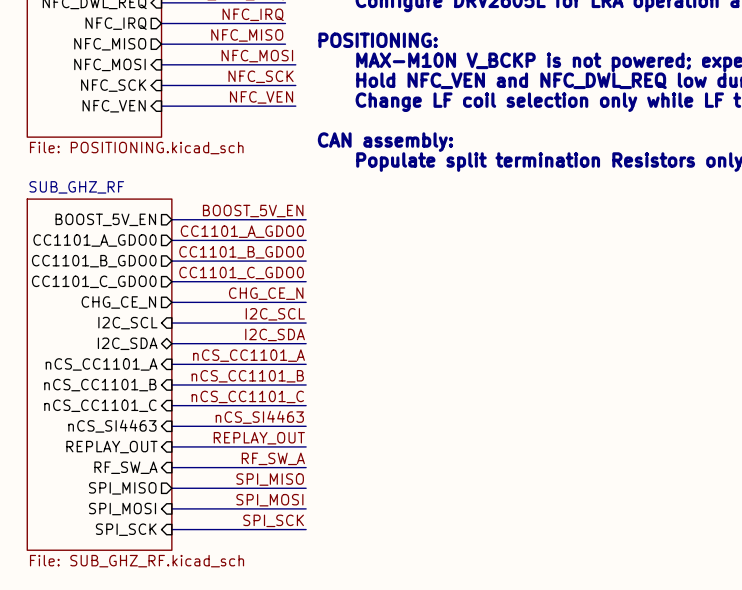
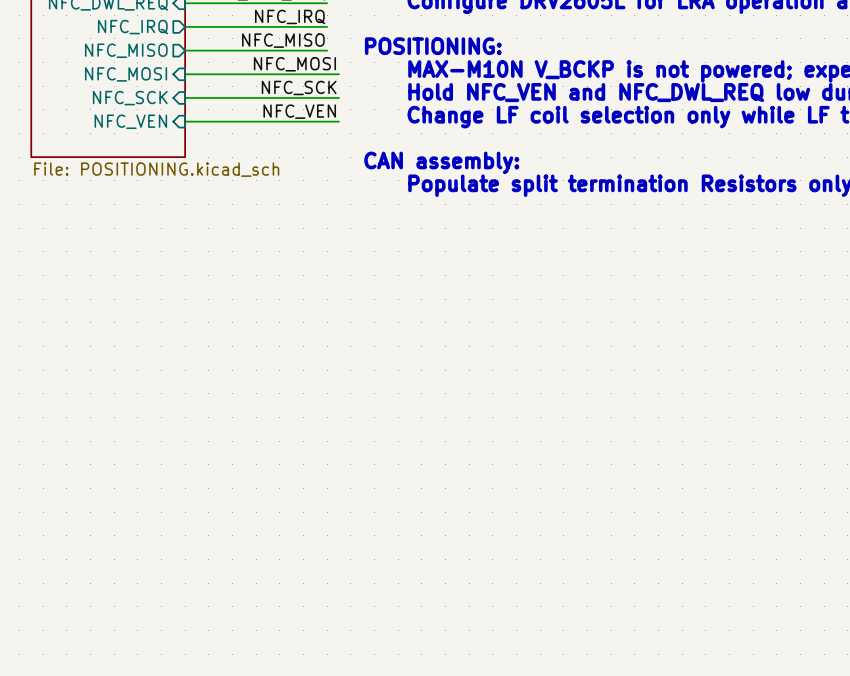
label: BOOST_5V_EN (253, 211) -> none
sheet pin: BOOST_5V_EN (105, 219) -> none
wire: (171, 219) (306, 219) -> none
label: CC1101_A_GDO0 (242, 231) -> none
sheet pin: CC1101_A_GDO0 (94, 240) -> none
wire: (171, 240) (306, 240) -> none
label: CC1101_B_GDO0 (241, 252) -> none
sheet pin: CC1101_B_GDO0 (94, 261) -> none
wire: (171, 261) (306, 261) -> none
label: CC1101_C_GDO0 (241, 272) -> none
sheet pin: CC1101_C_GDO0 (94, 281) -> none
wire: (171, 281) (306, 281) -> none
label: CHG_CE_N (266, 293) -> none
sheet pin: CHG_CE_N (118, 302) -> none
wire: (171, 302) (306, 302) -> none
label: I2C_SCL (275, 314) -> none
sheet pin: I2C_SCL (127, 323) -> none
wire: (171, 323) (306, 323) -> none
label: I2C_SDA (275, 334) -> none
sheet pin: I2C_SDA (127, 343) -> none
wire: (171, 343) (306, 343) -> none
label: nCS_CC1101_A (248, 355) -> none
sheet pin: nCS_CC1101_A (101, 364) -> none
wire: (171, 364) (306, 364) -> none
sheet SUB_GHZ_RF: File: SUB_GHZ_RF.kicad_sch (99, 374) -> none
label: nCS_CC1101_B (247, 376) -> none
wire: (171, 384) (306, 384) -> none
sheet pin: nCS_CC1101_B (100, 385) -> none
label: nCS_CC1101_C (247, 396) -> none
sheet pin: nCS_CC1101_C (100, 405) -> none
wire: (171, 405) (306, 405) -> none
label: nCS_SI4463 (259, 417) -> none
sheet pin: nCS_SI4463 (112, 426) -> none
wire: (171, 426) (306, 426) -> none
label: REPLAY_OUT (259, 438) -> none
wire: (171, 446) (306, 446) -> none
sheet pin: REPLAY_OUT (111, 447) -> none
label: RF_SW_A (273, 458) -> none
sheet pin: RF_SW_A (125, 467) -> none
wire: (171, 467) (306, 467) -> none
label: SPI_MISO (270, 479) -> none
sheet pin: SPI_MISO (122, 488) -> none
wire: (171, 488) (306, 488) -> none
label: SPI_MOSI (269, 500) -> none
wire: (171, 508) (306, 508) -> none
sheet pin: SPI_MOSI (122, 509) -> none
label: SPI_SCK (273, 520) -> none
sheet pin: SPI_SCK (126, 529) -> none
wire: (171, 529) (306, 529) -> none

